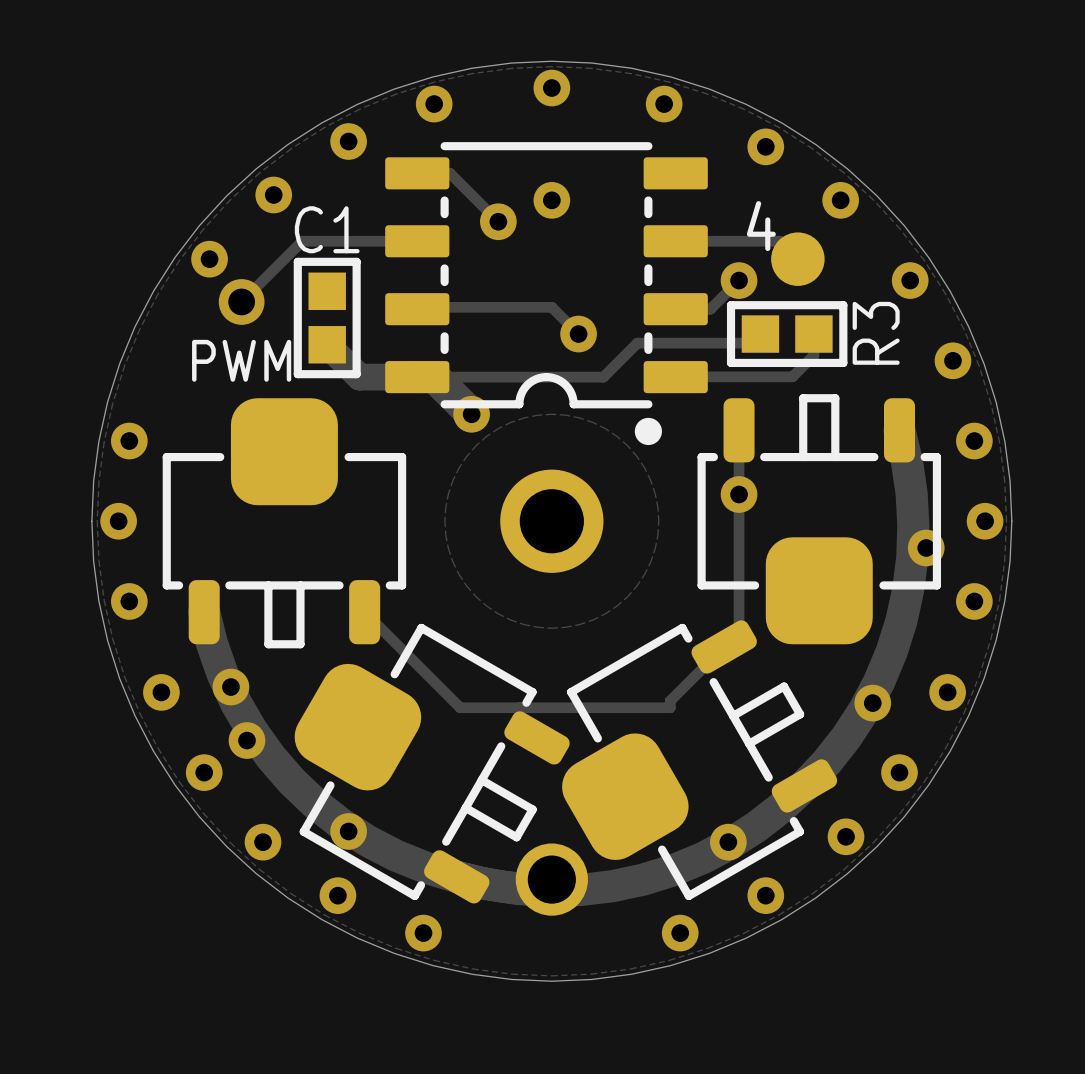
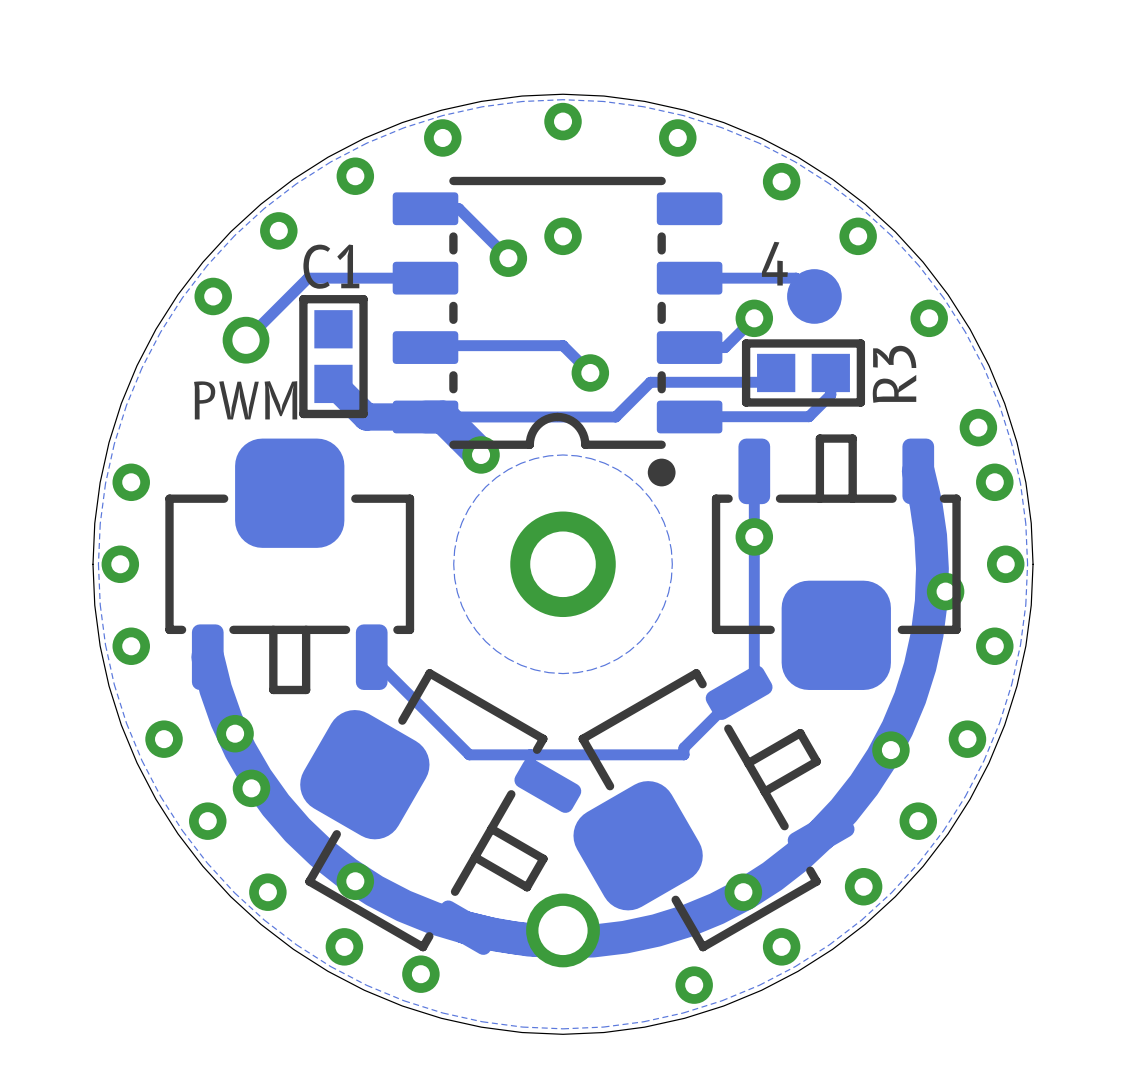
via position: (952, 360) -> (978, 427)
via position: (423, 933) -> (420, 974)

